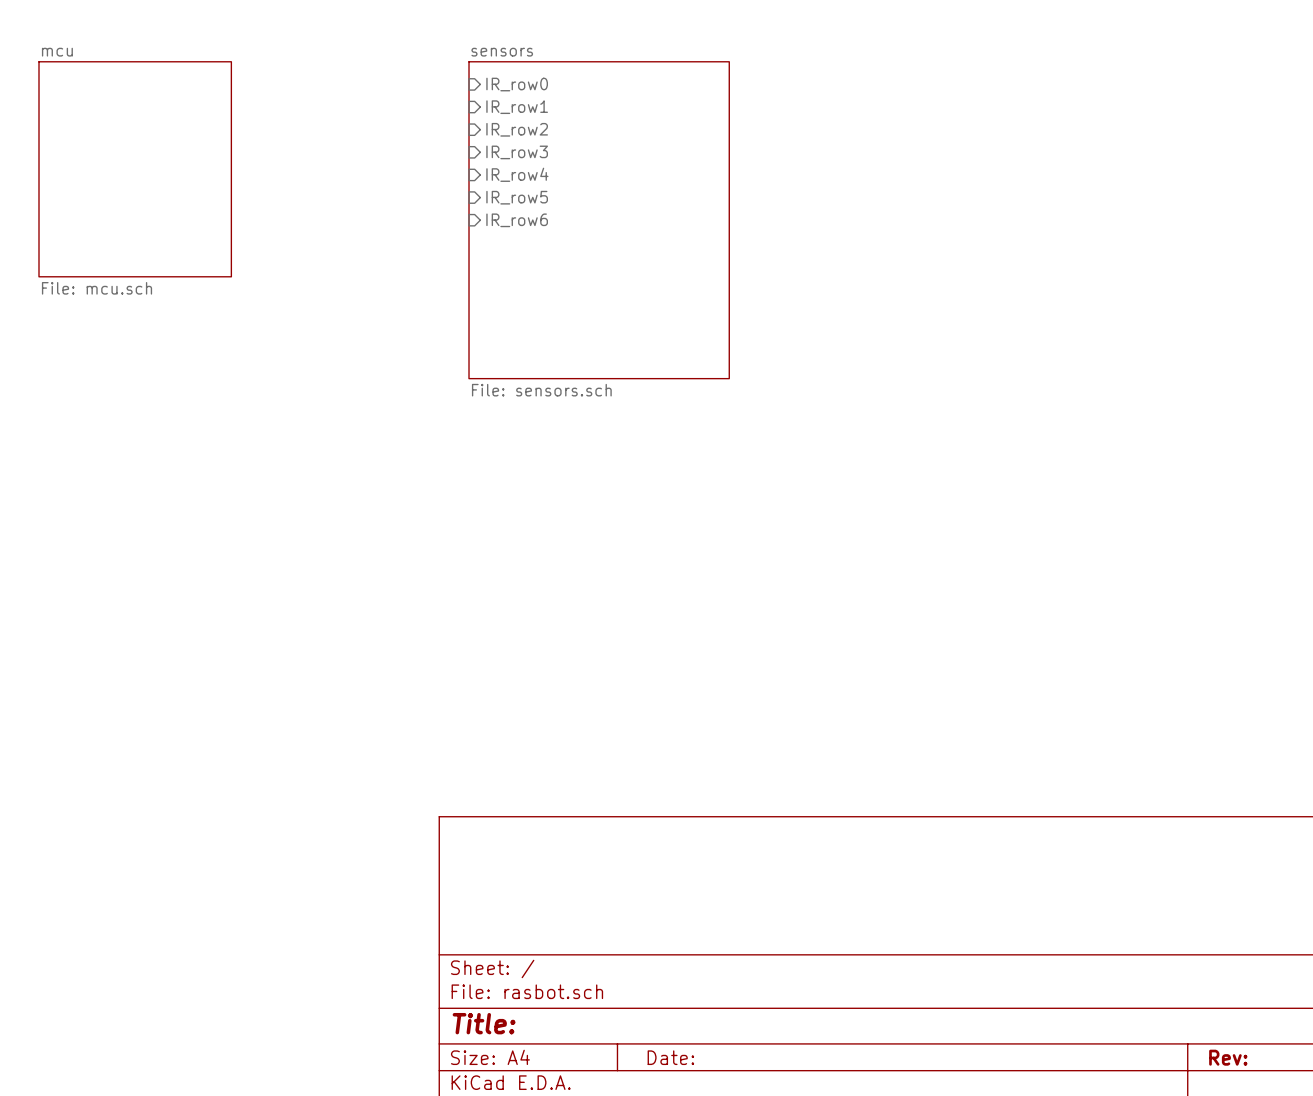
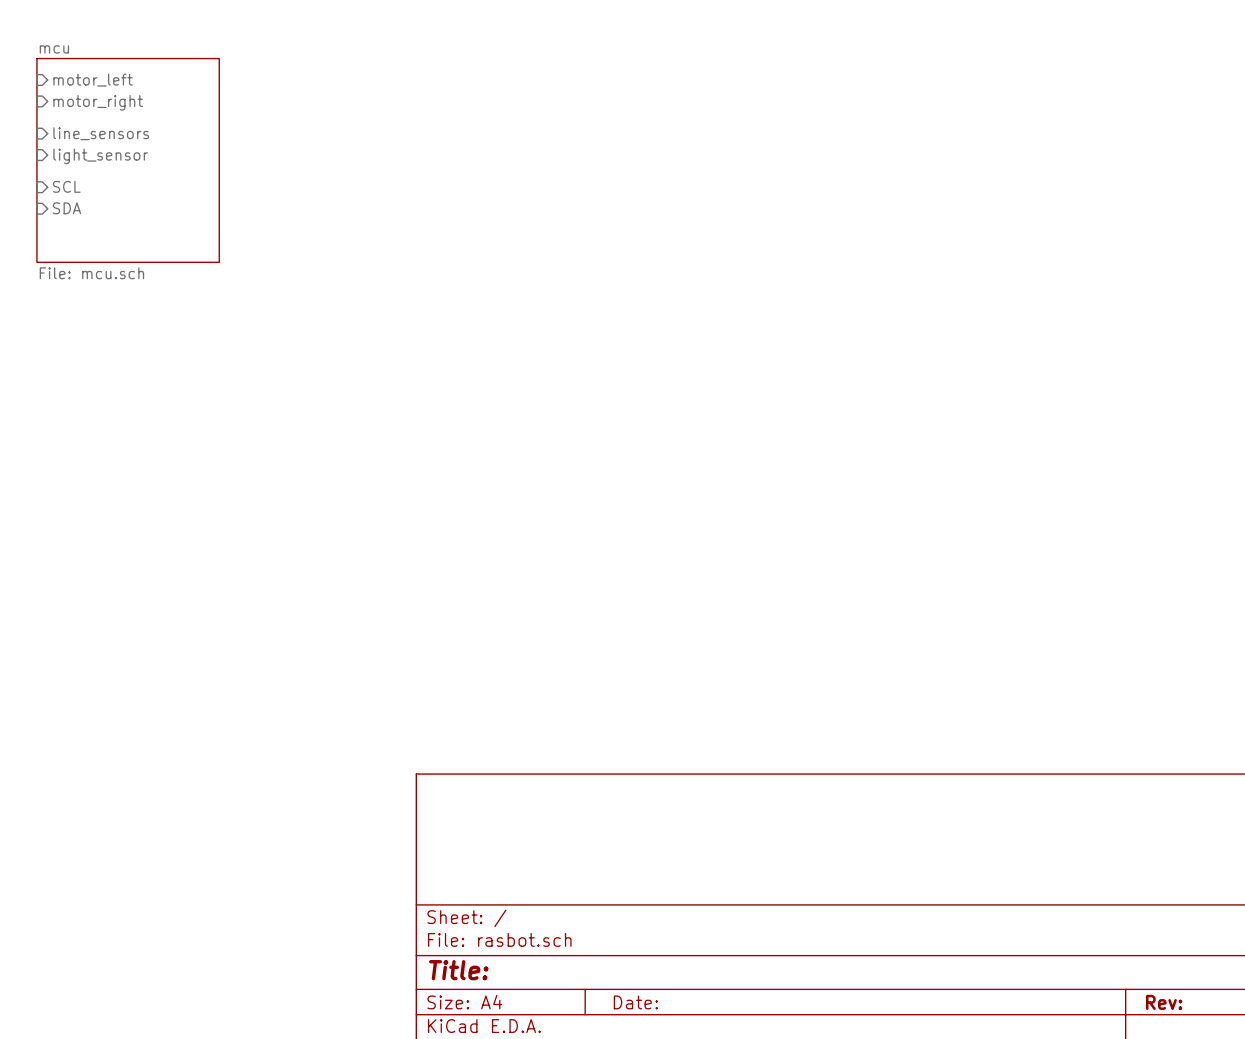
sheet pin: none -> motor_left (93, 80)
sheet pin: IR_row0 (517, 84) -> none
sheet pin: IR_row1 (517, 107) -> none
sheet pin: none -> motor_right (98, 102)
sheet pin: IR_row2 (517, 129) -> none
sheet pin: none -> line_sensors (101, 133)
sheet pin: IR_row3 (517, 152) -> none
sheet pin: none -> light_sensor (100, 156)
sheet pin: IR_row4 (517, 174) -> none
sheet pin: none -> SCL (66, 186)
sheet pin: IR_row5 (517, 197) -> none
sheet pin: none -> SDA (67, 208)
sheet pin: IR_row6 (517, 220) -> none
sheet sensors: File: sensors.sch (599, 220) -> none

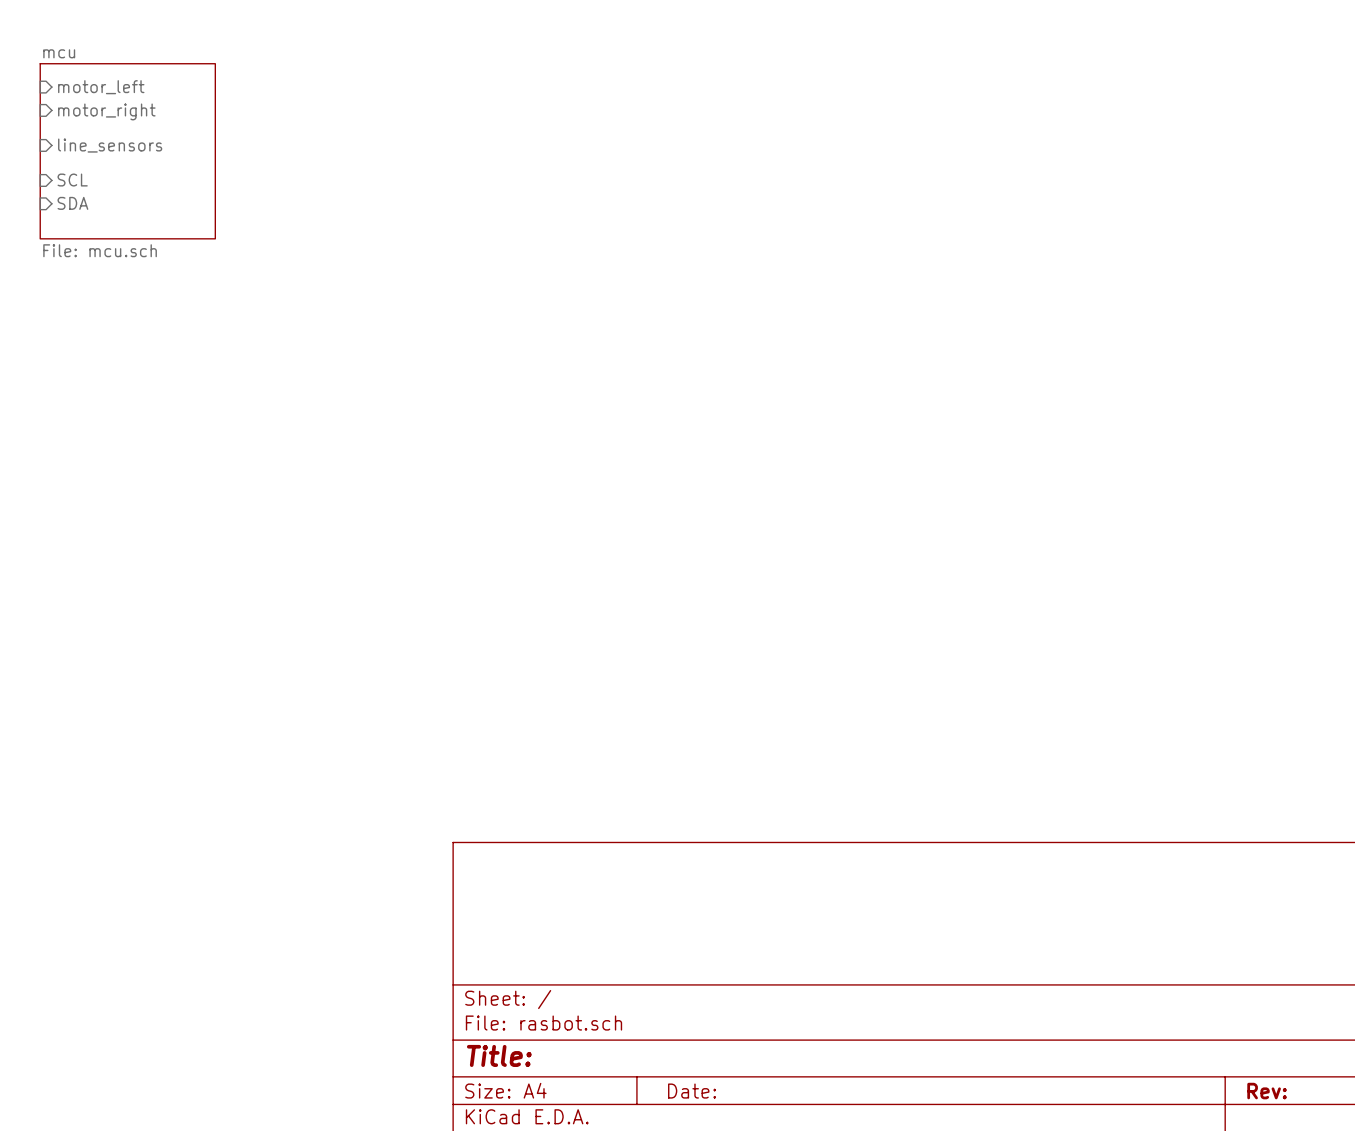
sheet mcu: none -> File: mcu.sch (127, 151)
sheet pin: light_sensor (100, 156) -> none
sheet mcu: File: mcu.sch (128, 160) -> none
sheet pin: none -> SCL (72, 180)
sheet pin: SCL (66, 186) -> SDA (72, 203)
sheet pin: SDA (67, 208) -> none

